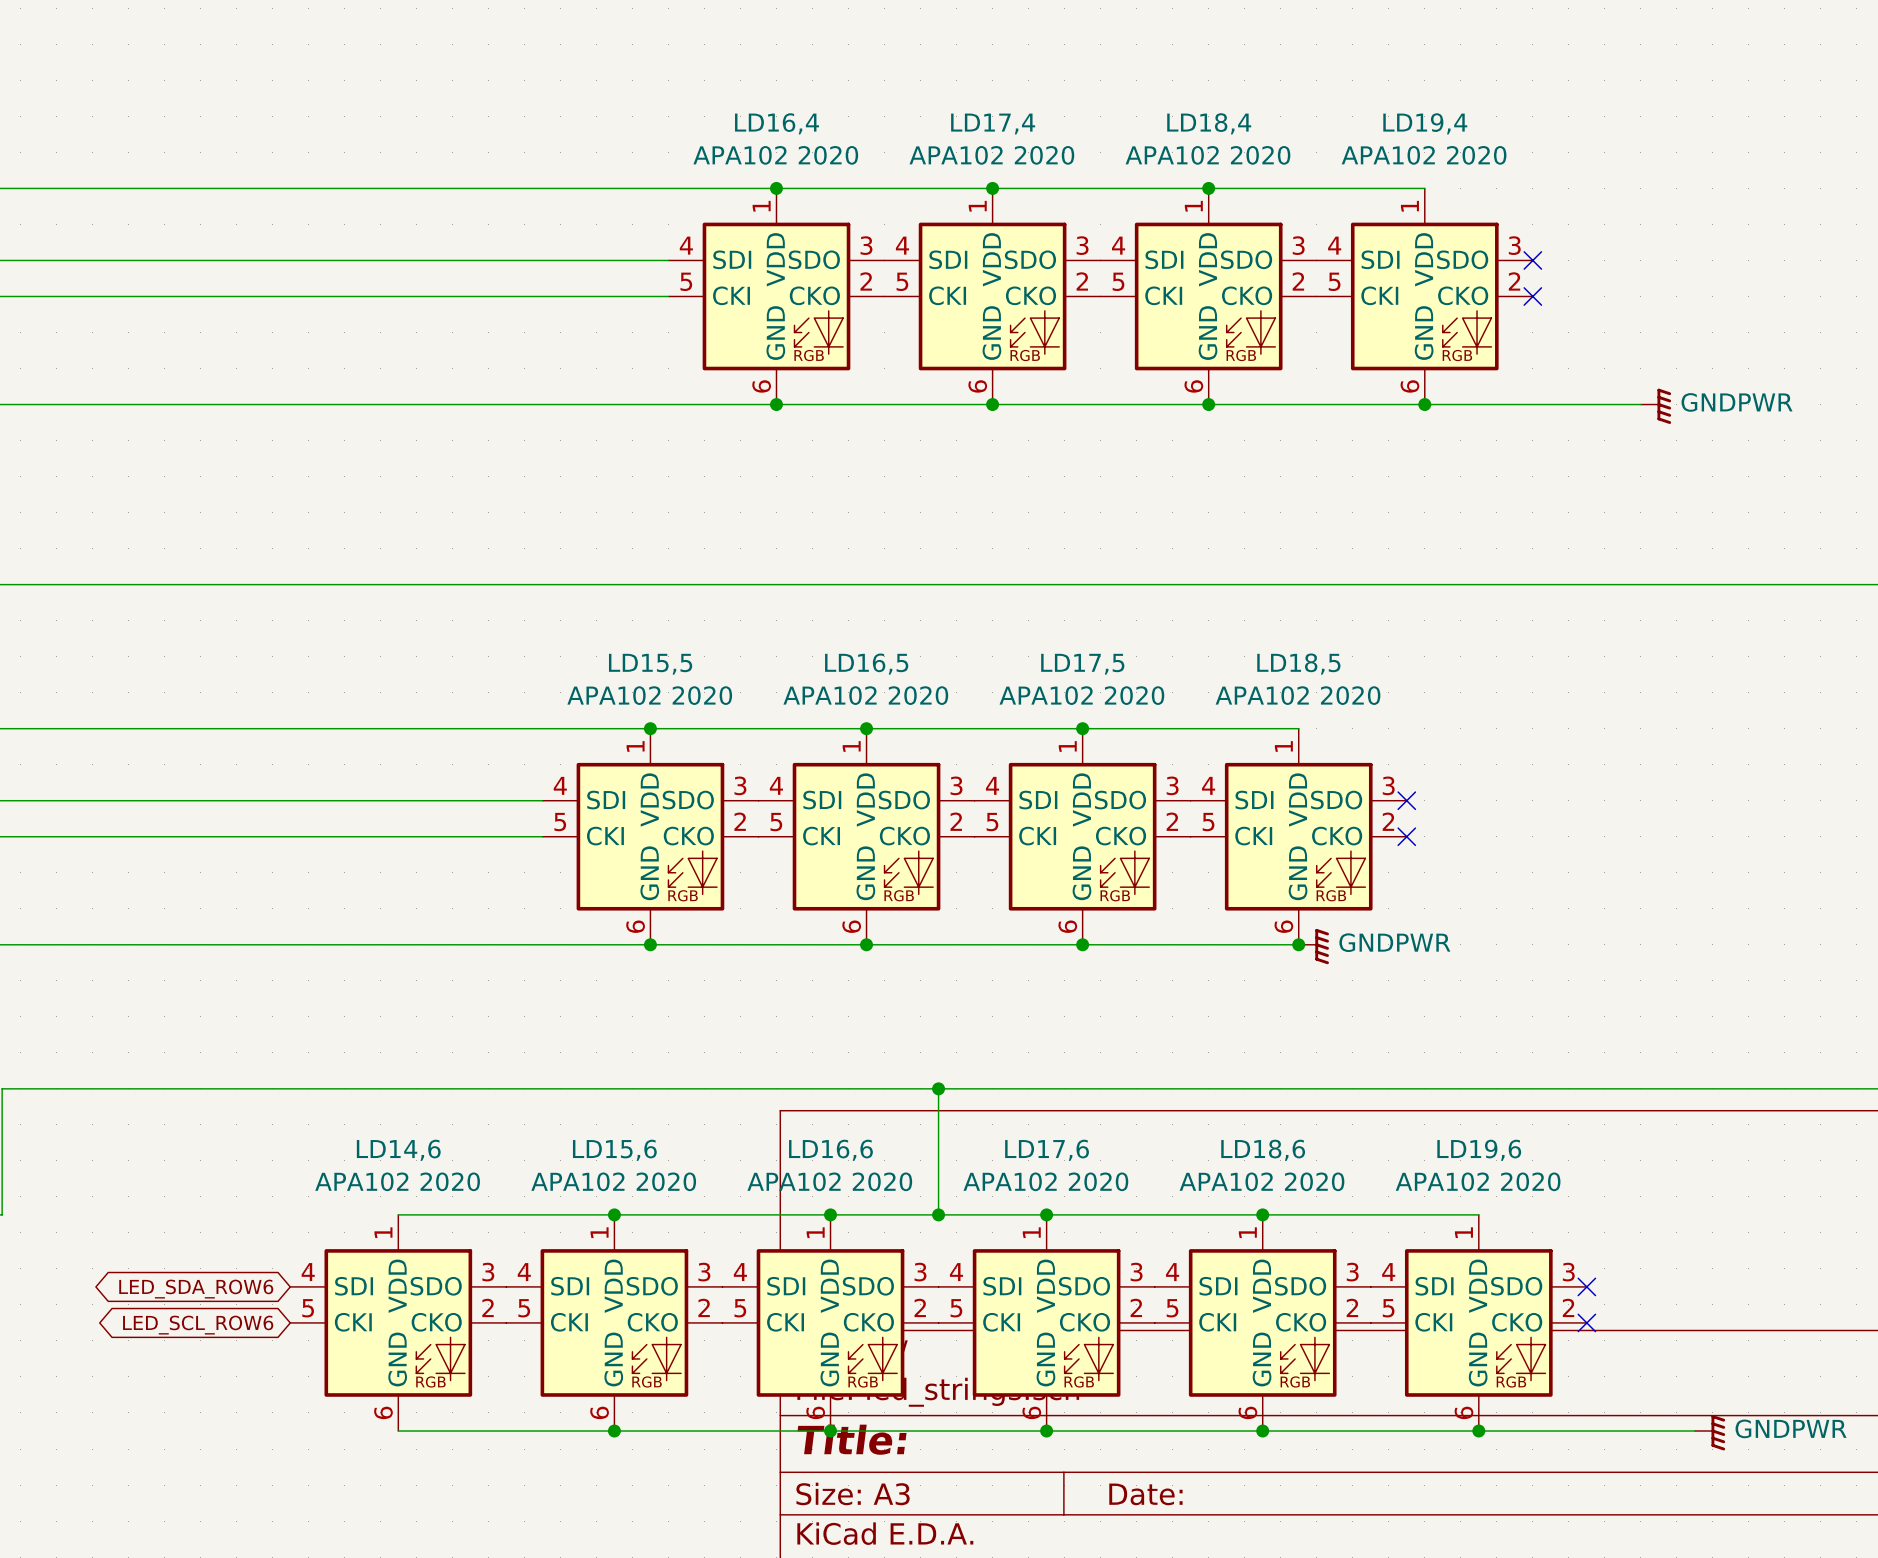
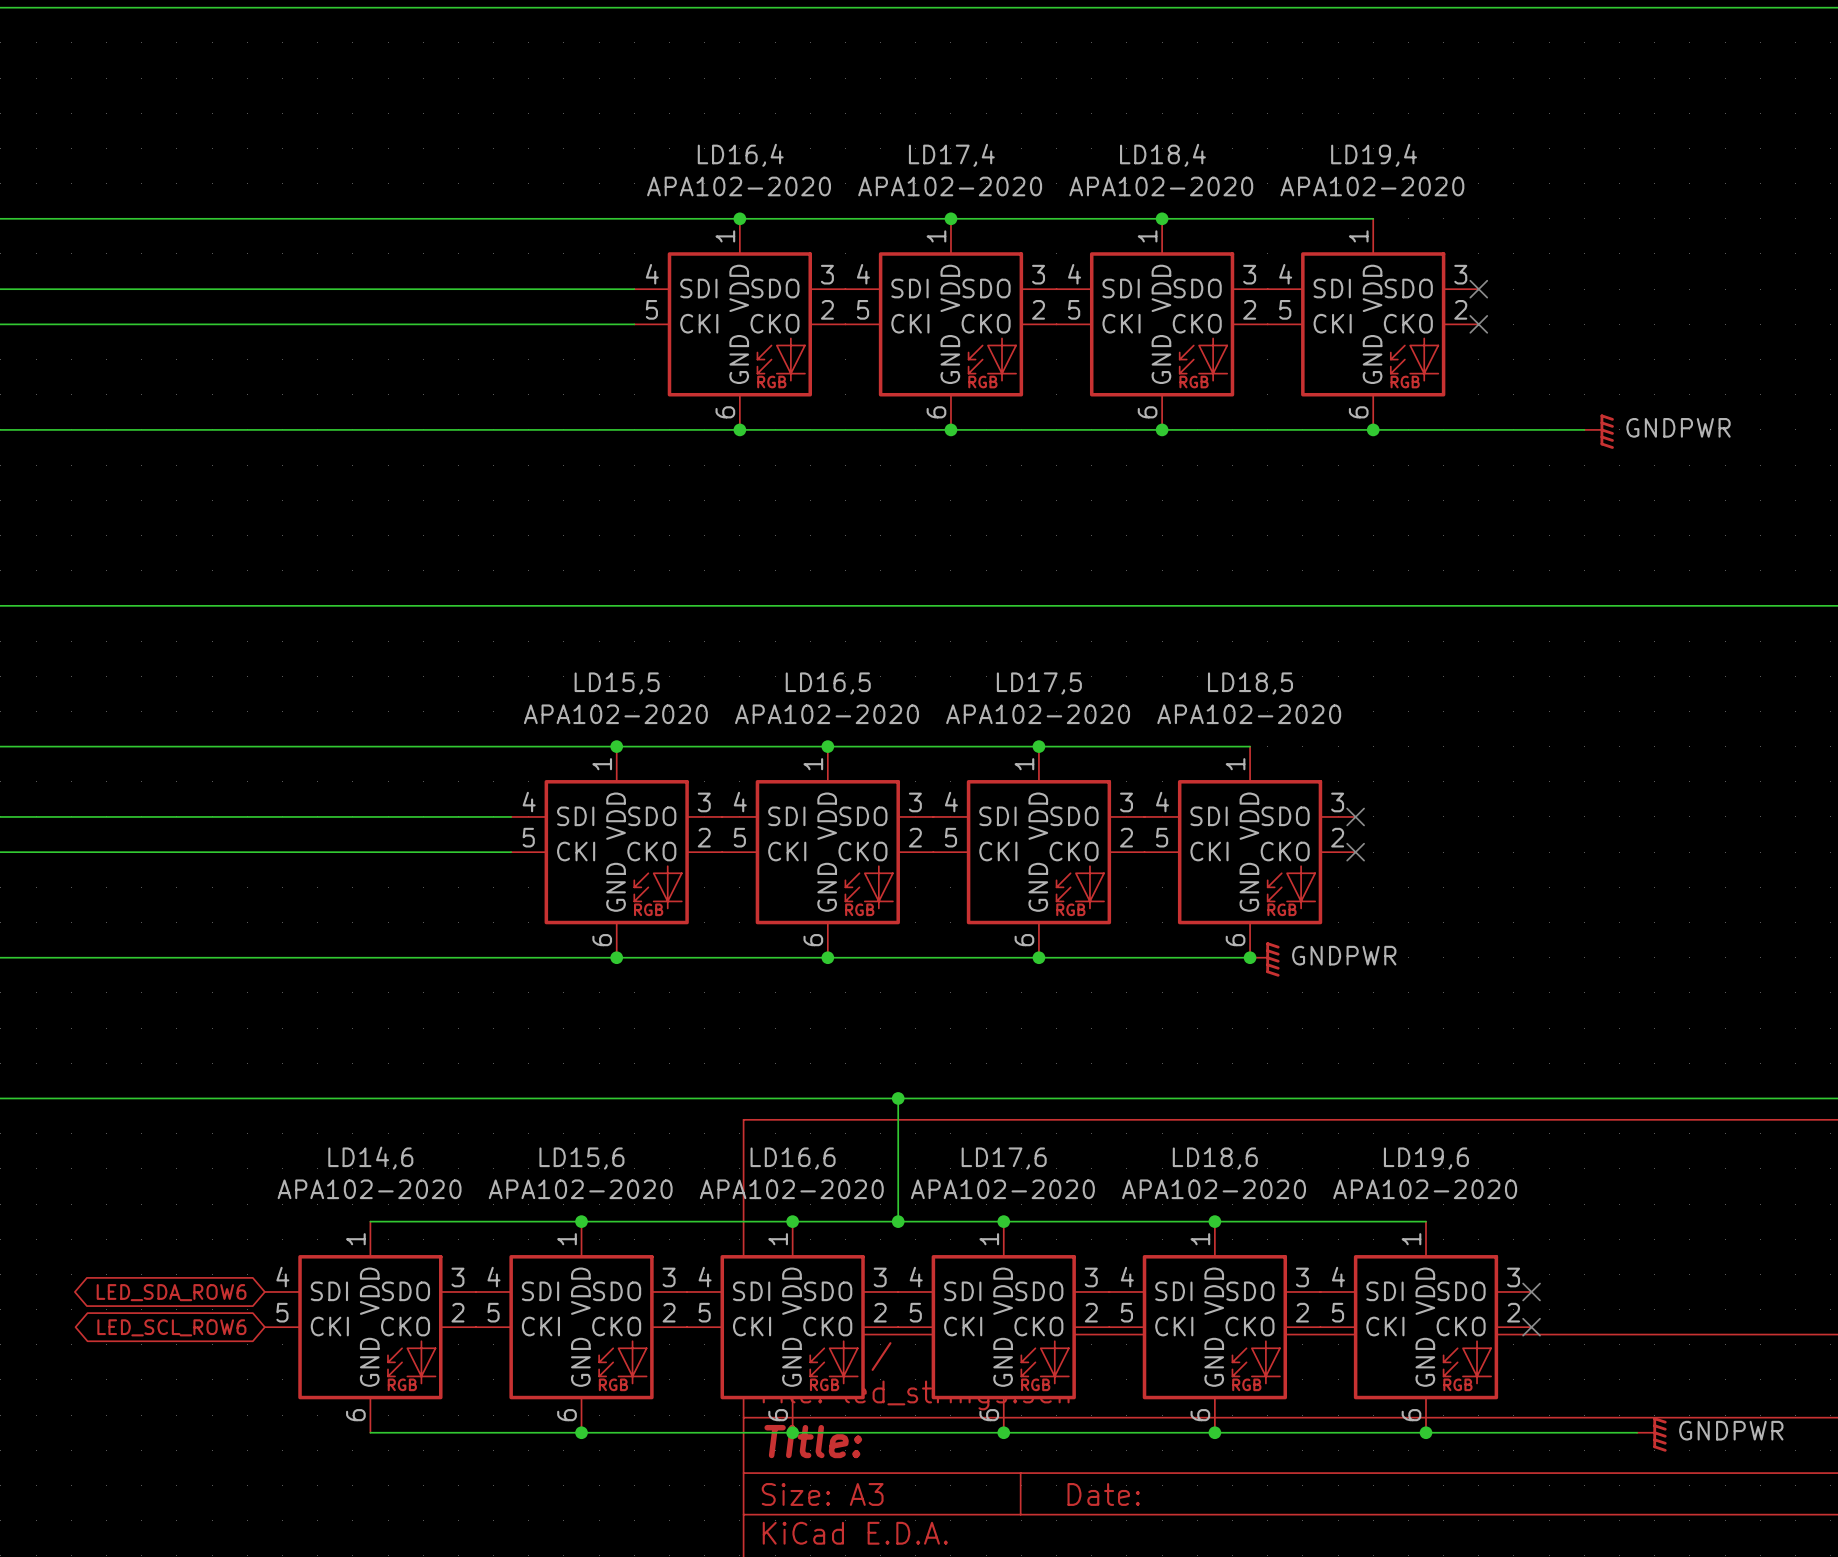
LD16,4 value: APA102 2020 (775, 155) -> APA102-2020 (739, 186)
LD17,4 value: APA102 2020 (991, 155) -> APA102-2020 (950, 186)
LD18,4 value: APA102 2020 (1207, 155) -> APA102-2020 (1161, 186)
LD19,4 value: APA102 2020 (1424, 155) -> APA102-2020 (1372, 186)
LD15,5 value: APA102 2020 (649, 695) -> APA102-2020 (615, 714)
LD16,5 value: APA102 2020 (865, 695) -> APA102-2020 (826, 714)
LD17,5 value: APA102 2020 (1081, 695) -> APA102-2020 (1038, 714)
LD18,5 value: APA102 2020 (1298, 695) -> APA102-2020 (1249, 714)
LD14,6 value: APA102 2020 (397, 1181) -> APA102-2020 (369, 1189)
LD15,6 value: APA102 2020 (613, 1181) -> APA102-2020 (580, 1189)
LD16,6 value: APA102 2020 (829, 1181) -> APA102-2020 (791, 1189)
LD17,6 value: APA102 2020 (1045, 1181) -> APA102-2020 (1002, 1189)
LD18,6 value: APA102 2020 (1261, 1181) -> APA102-2020 (1214, 1189)
LD19,6 value: APA102 2020 (1478, 1181) -> APA102-2020 (1425, 1189)

